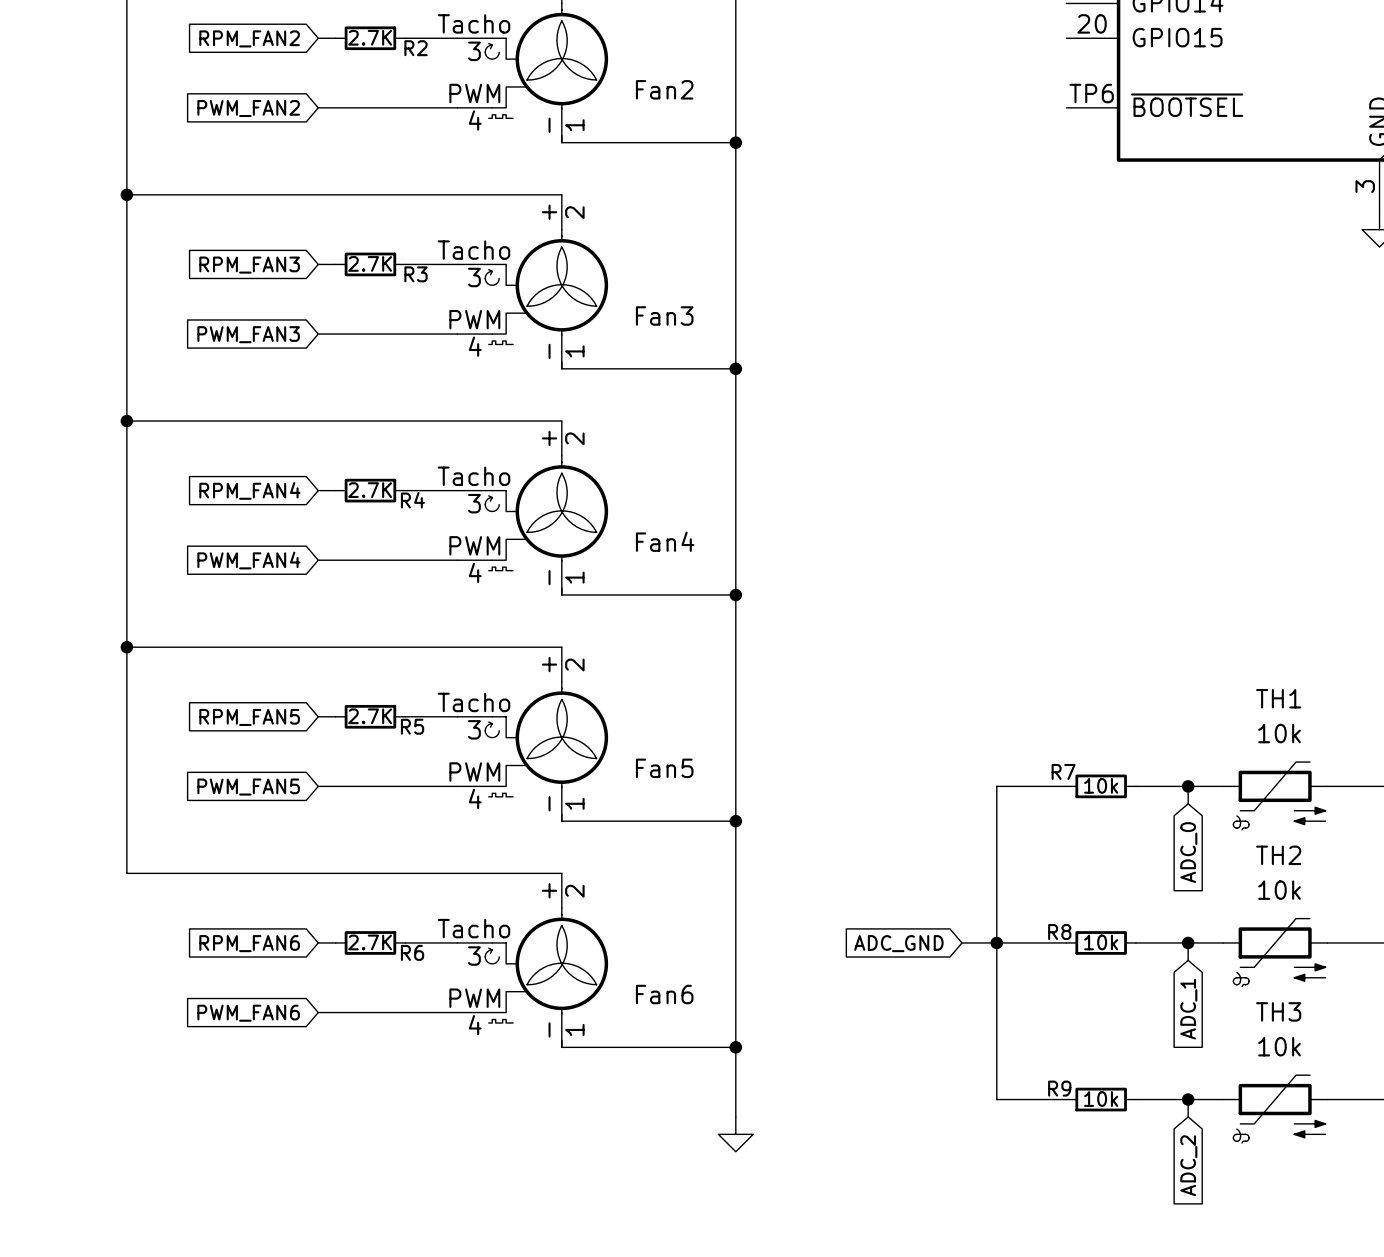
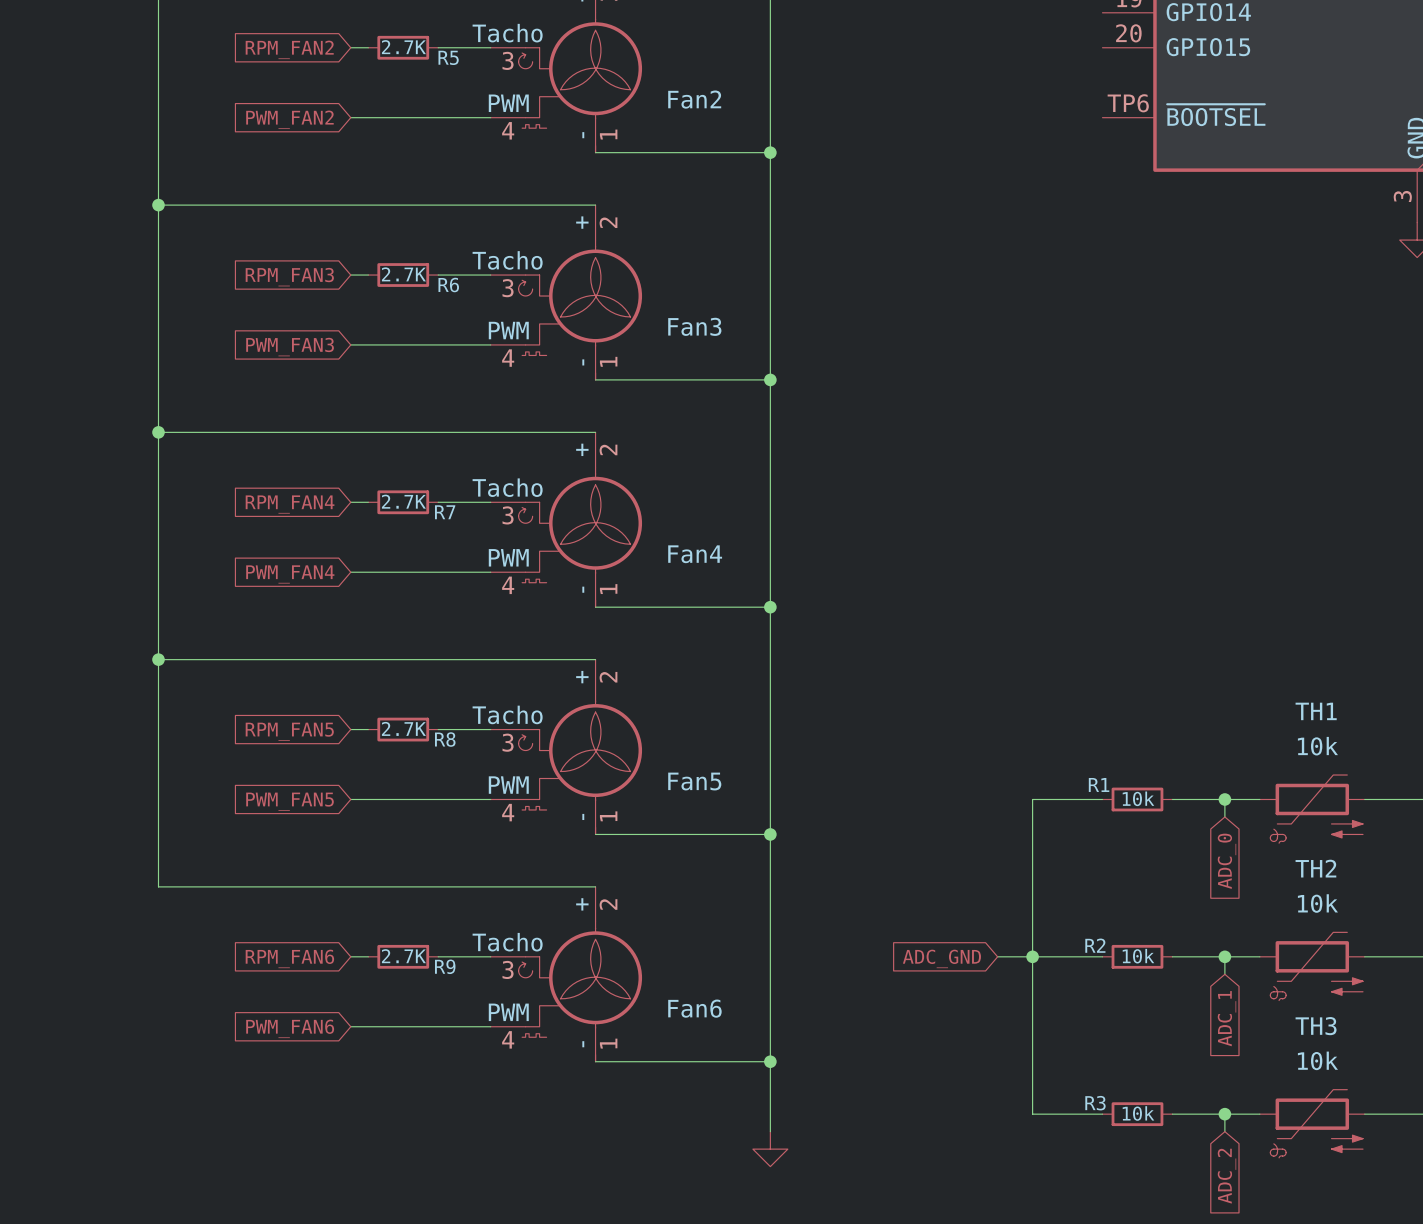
R2 name: R2 (416, 48) -> R5 (448, 57)
R3 name: R3 (416, 274) -> R6 (448, 285)
R4 name: R4 (412, 500) -> R7 (445, 512)
R5 name: R5 (412, 726) -> R8 (445, 739)
R7 name: R7 (1063, 771) -> R1 (1099, 784)
R8 name: R8 (1059, 932) -> R2 (1095, 945)
R6 name: R6 (412, 952) -> R9 (445, 966)
R9 name: R9 (1059, 1088) -> R3 (1095, 1103)

